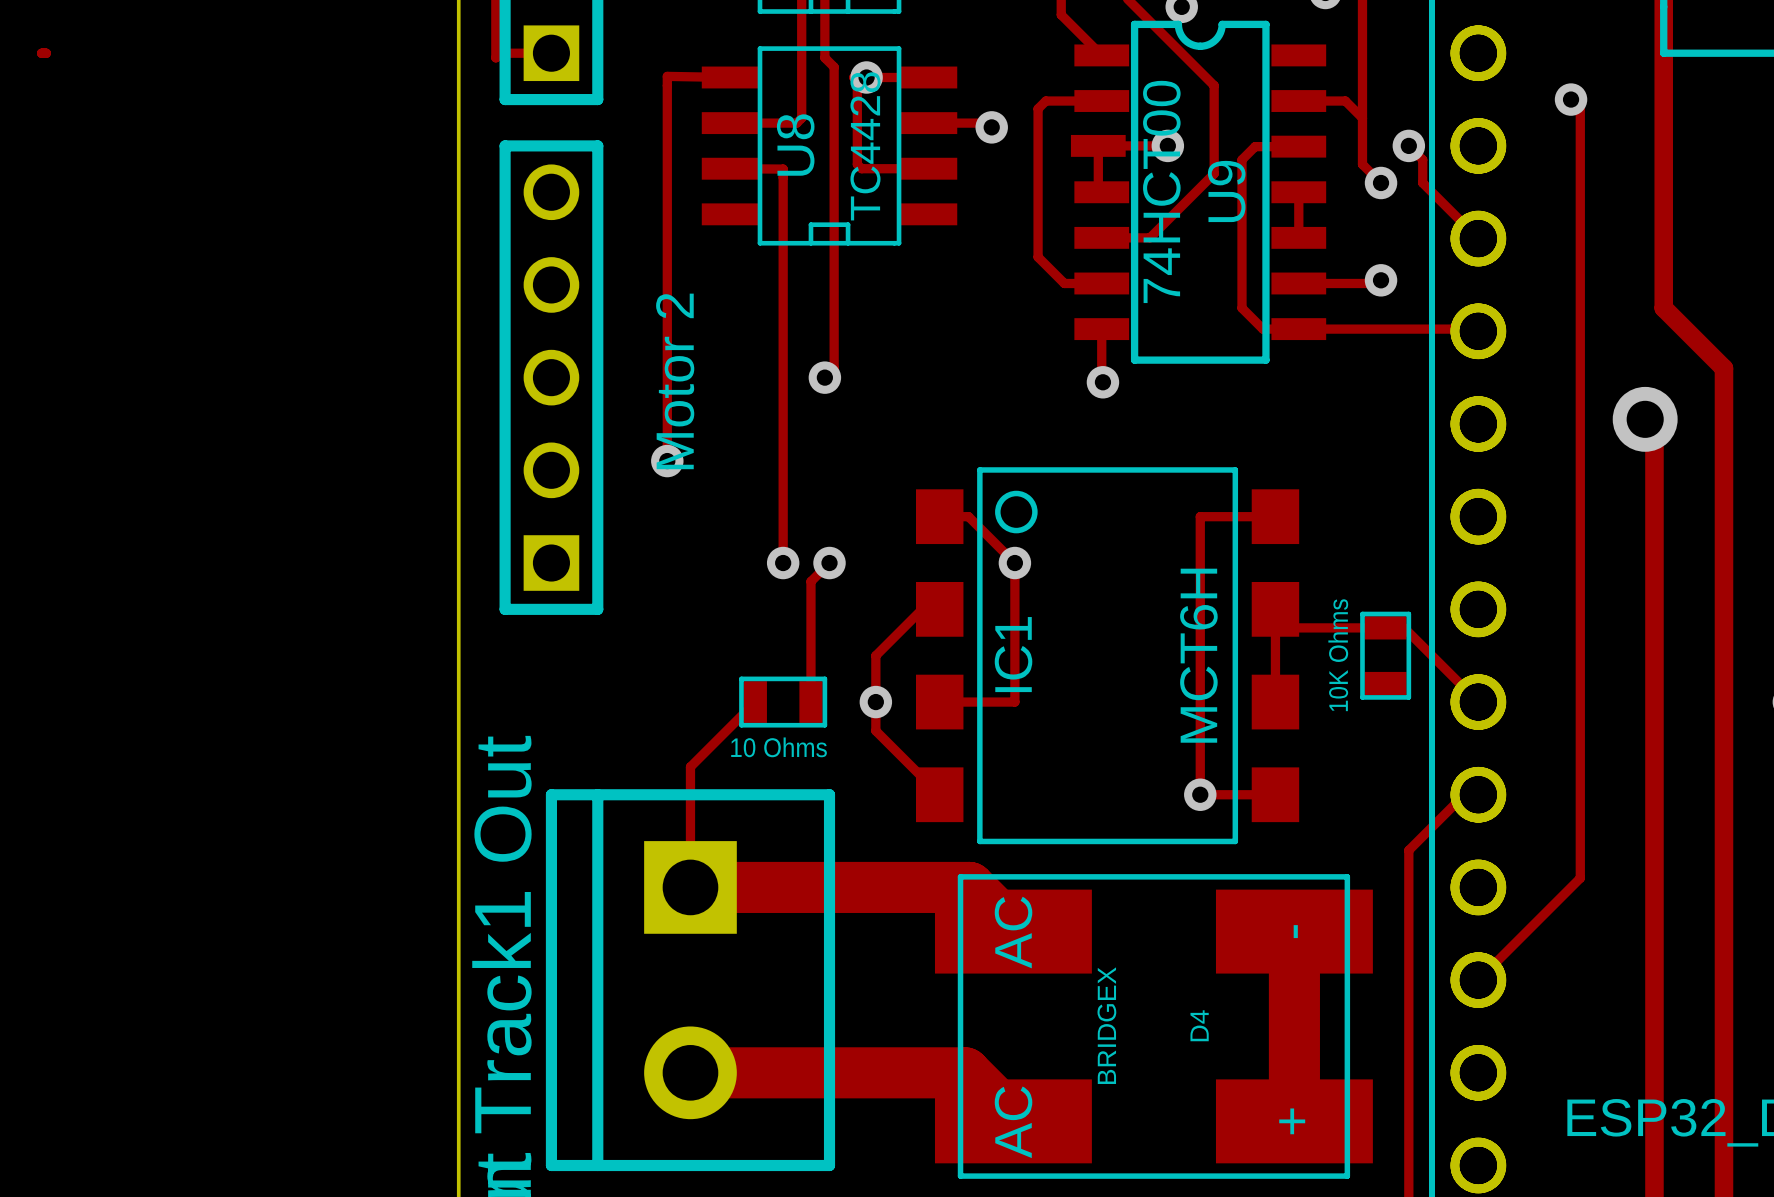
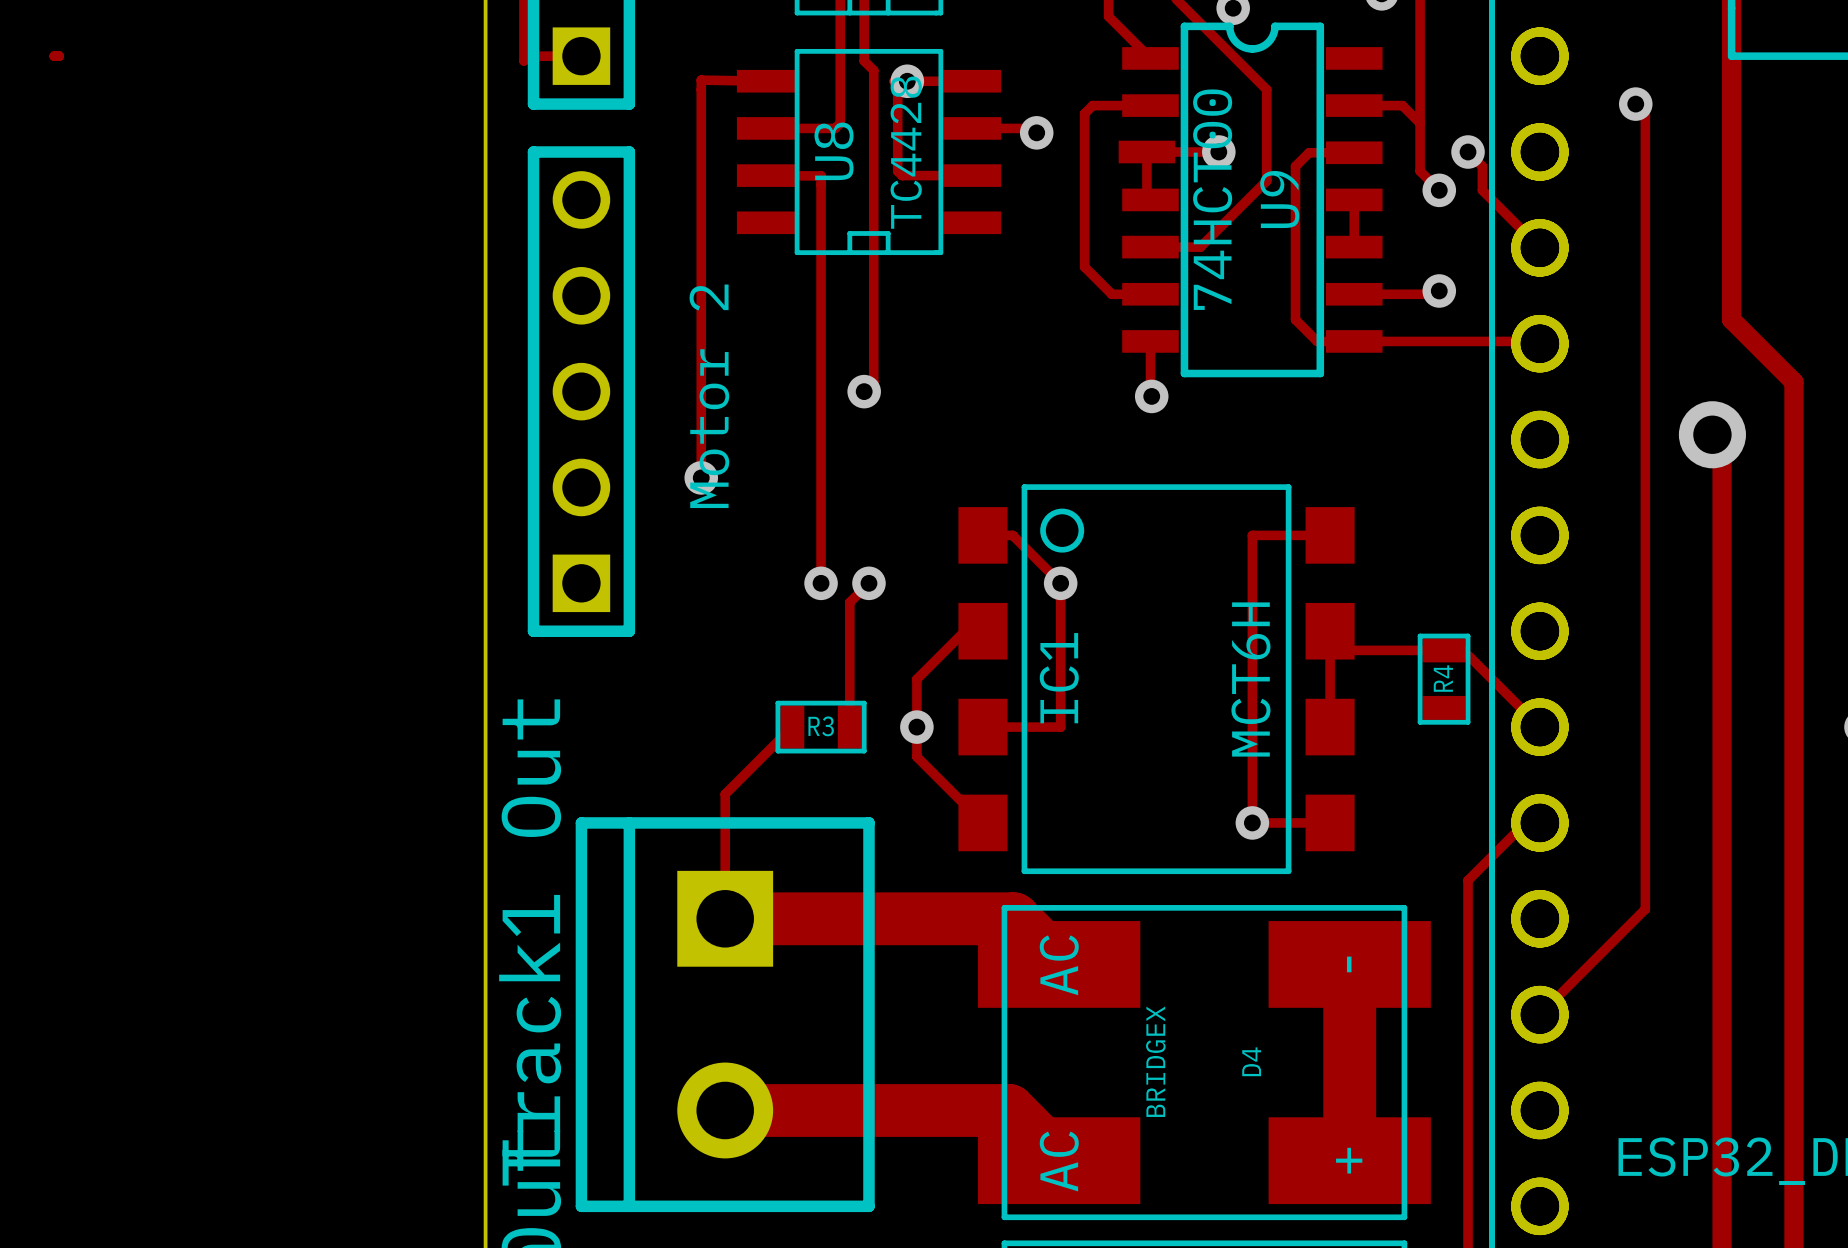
R4 value: 10K Ohms (1338, 655) -> none
R4 name: none -> R4 (1443, 678)
R3 name: none -> R3 (821, 726)
R3 value: 10 Ohms (779, 747) -> none

